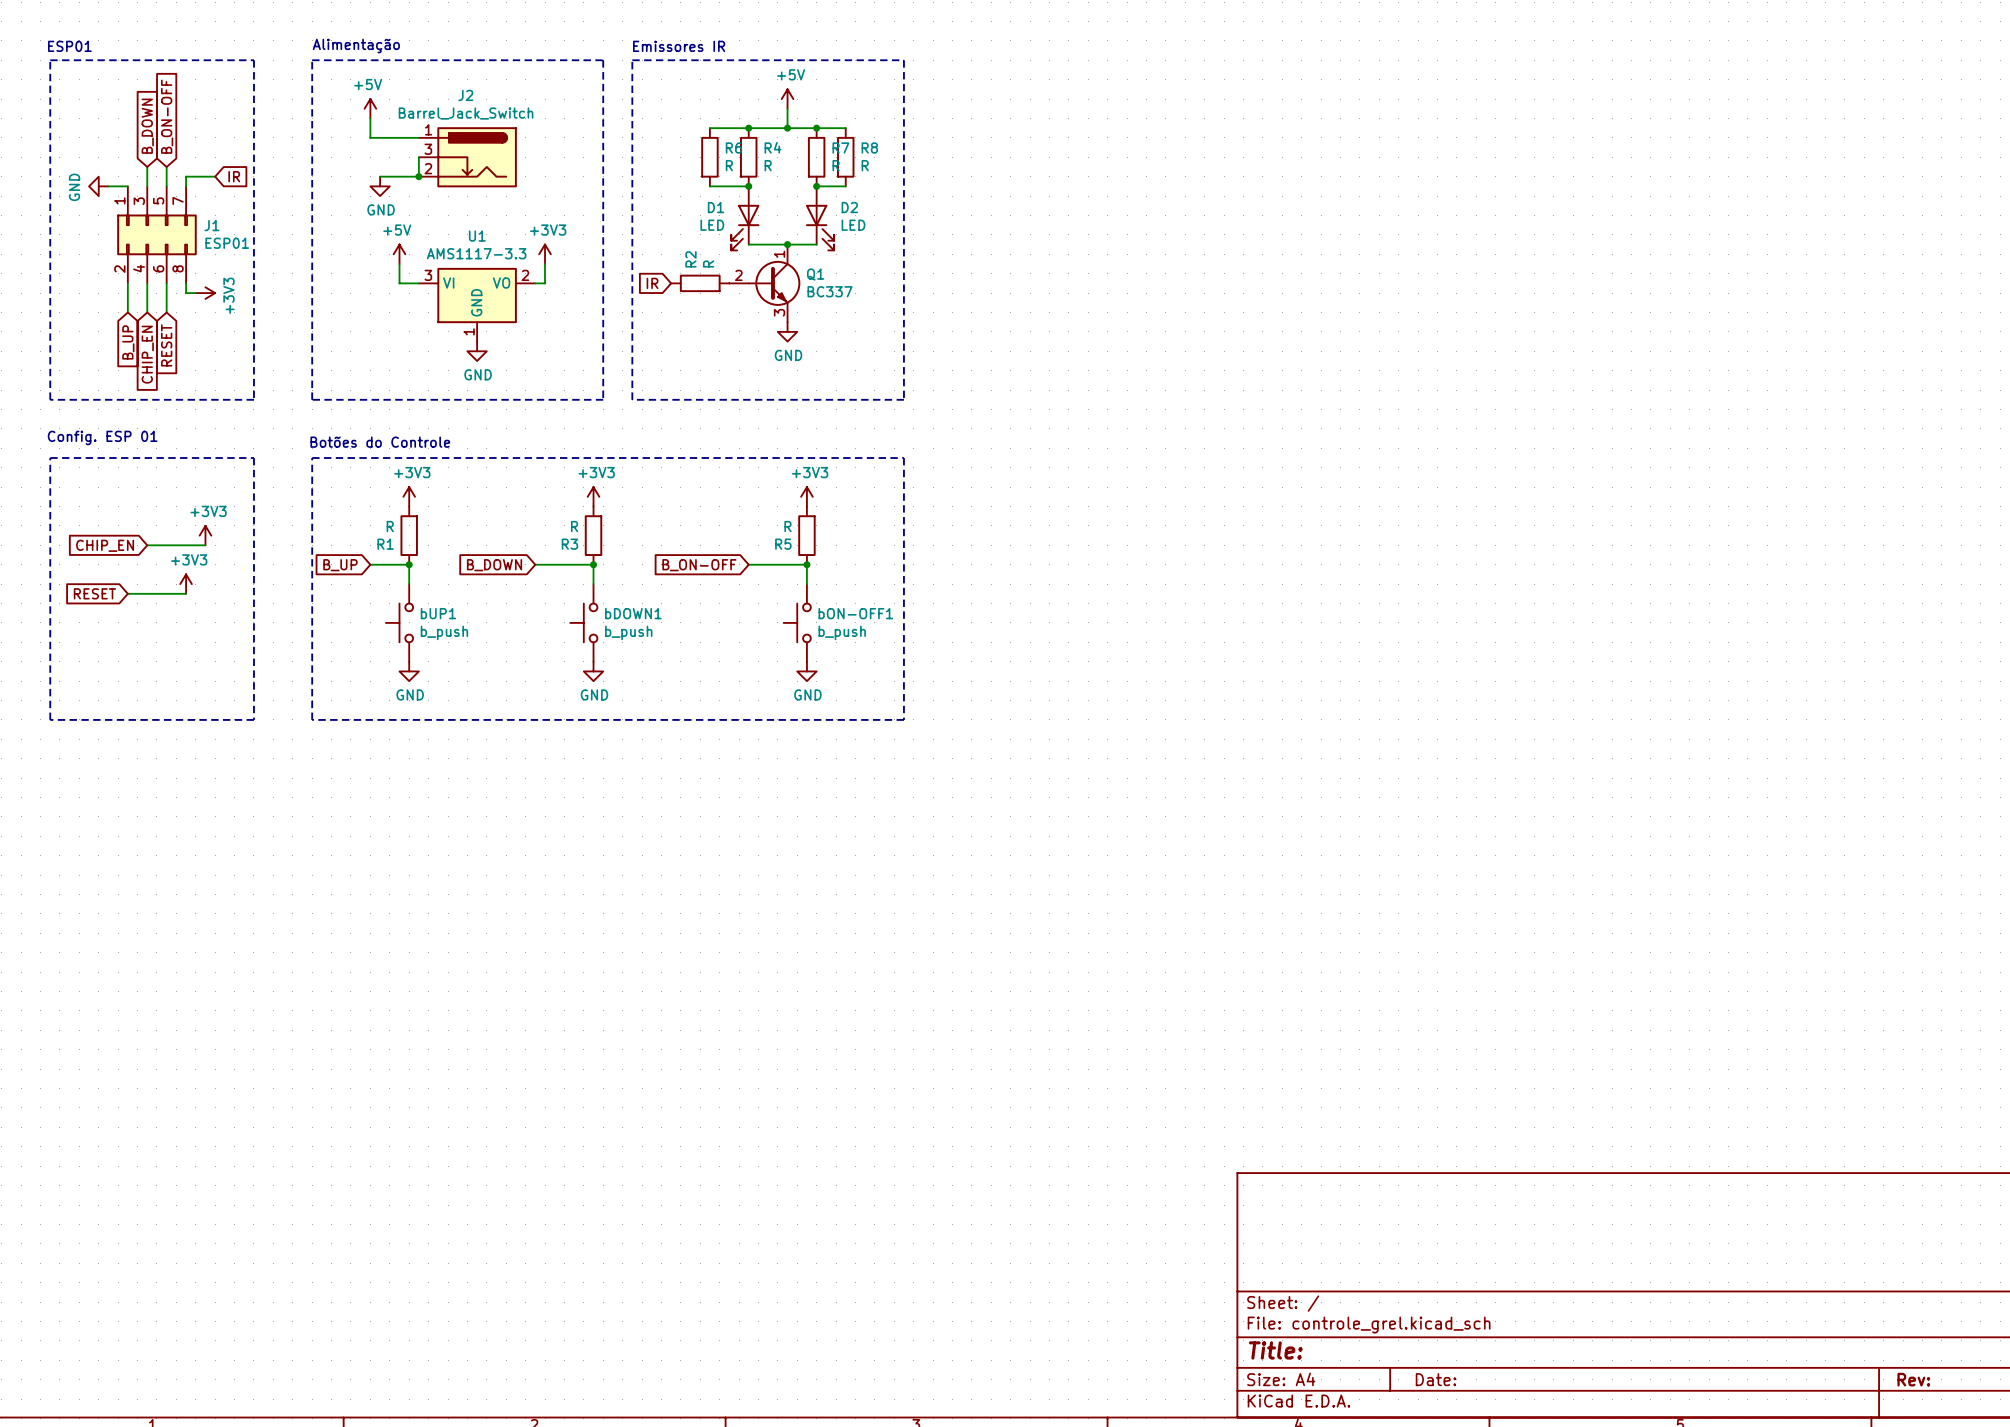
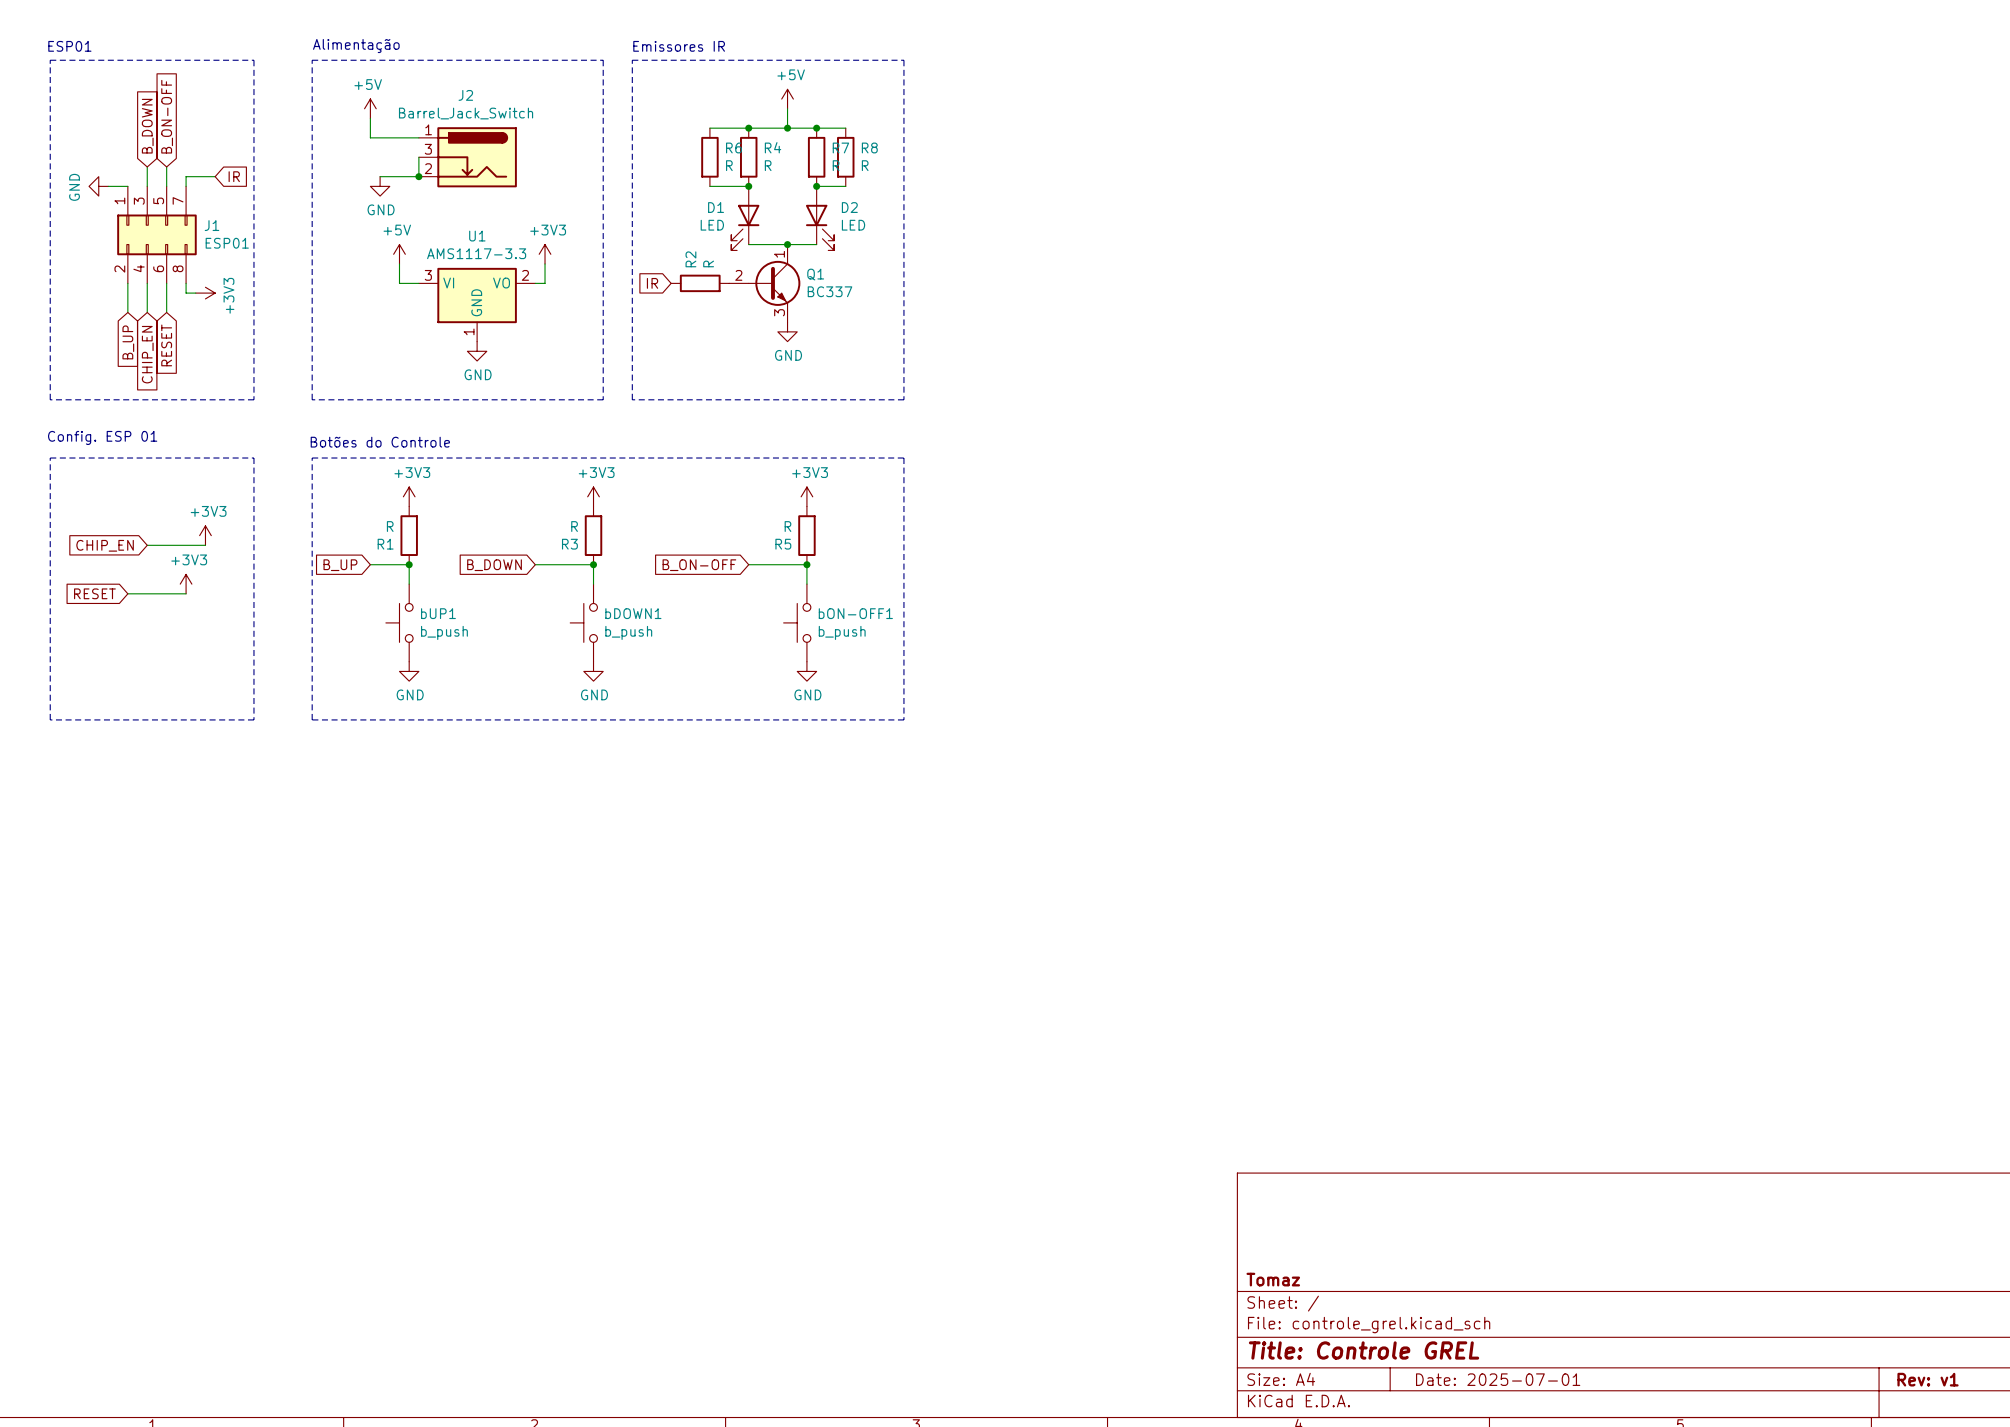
title block: none -> Tomaz (1273, 1279)
title block: Title: (1275, 1350) -> Title: Controle GREL (1364, 1350)
title block: Date: (1435, 1379) -> Date: 2025-07-01 (1498, 1379)
title block: Rev: (1913, 1379) -> Rev: v1 (1928, 1379)

